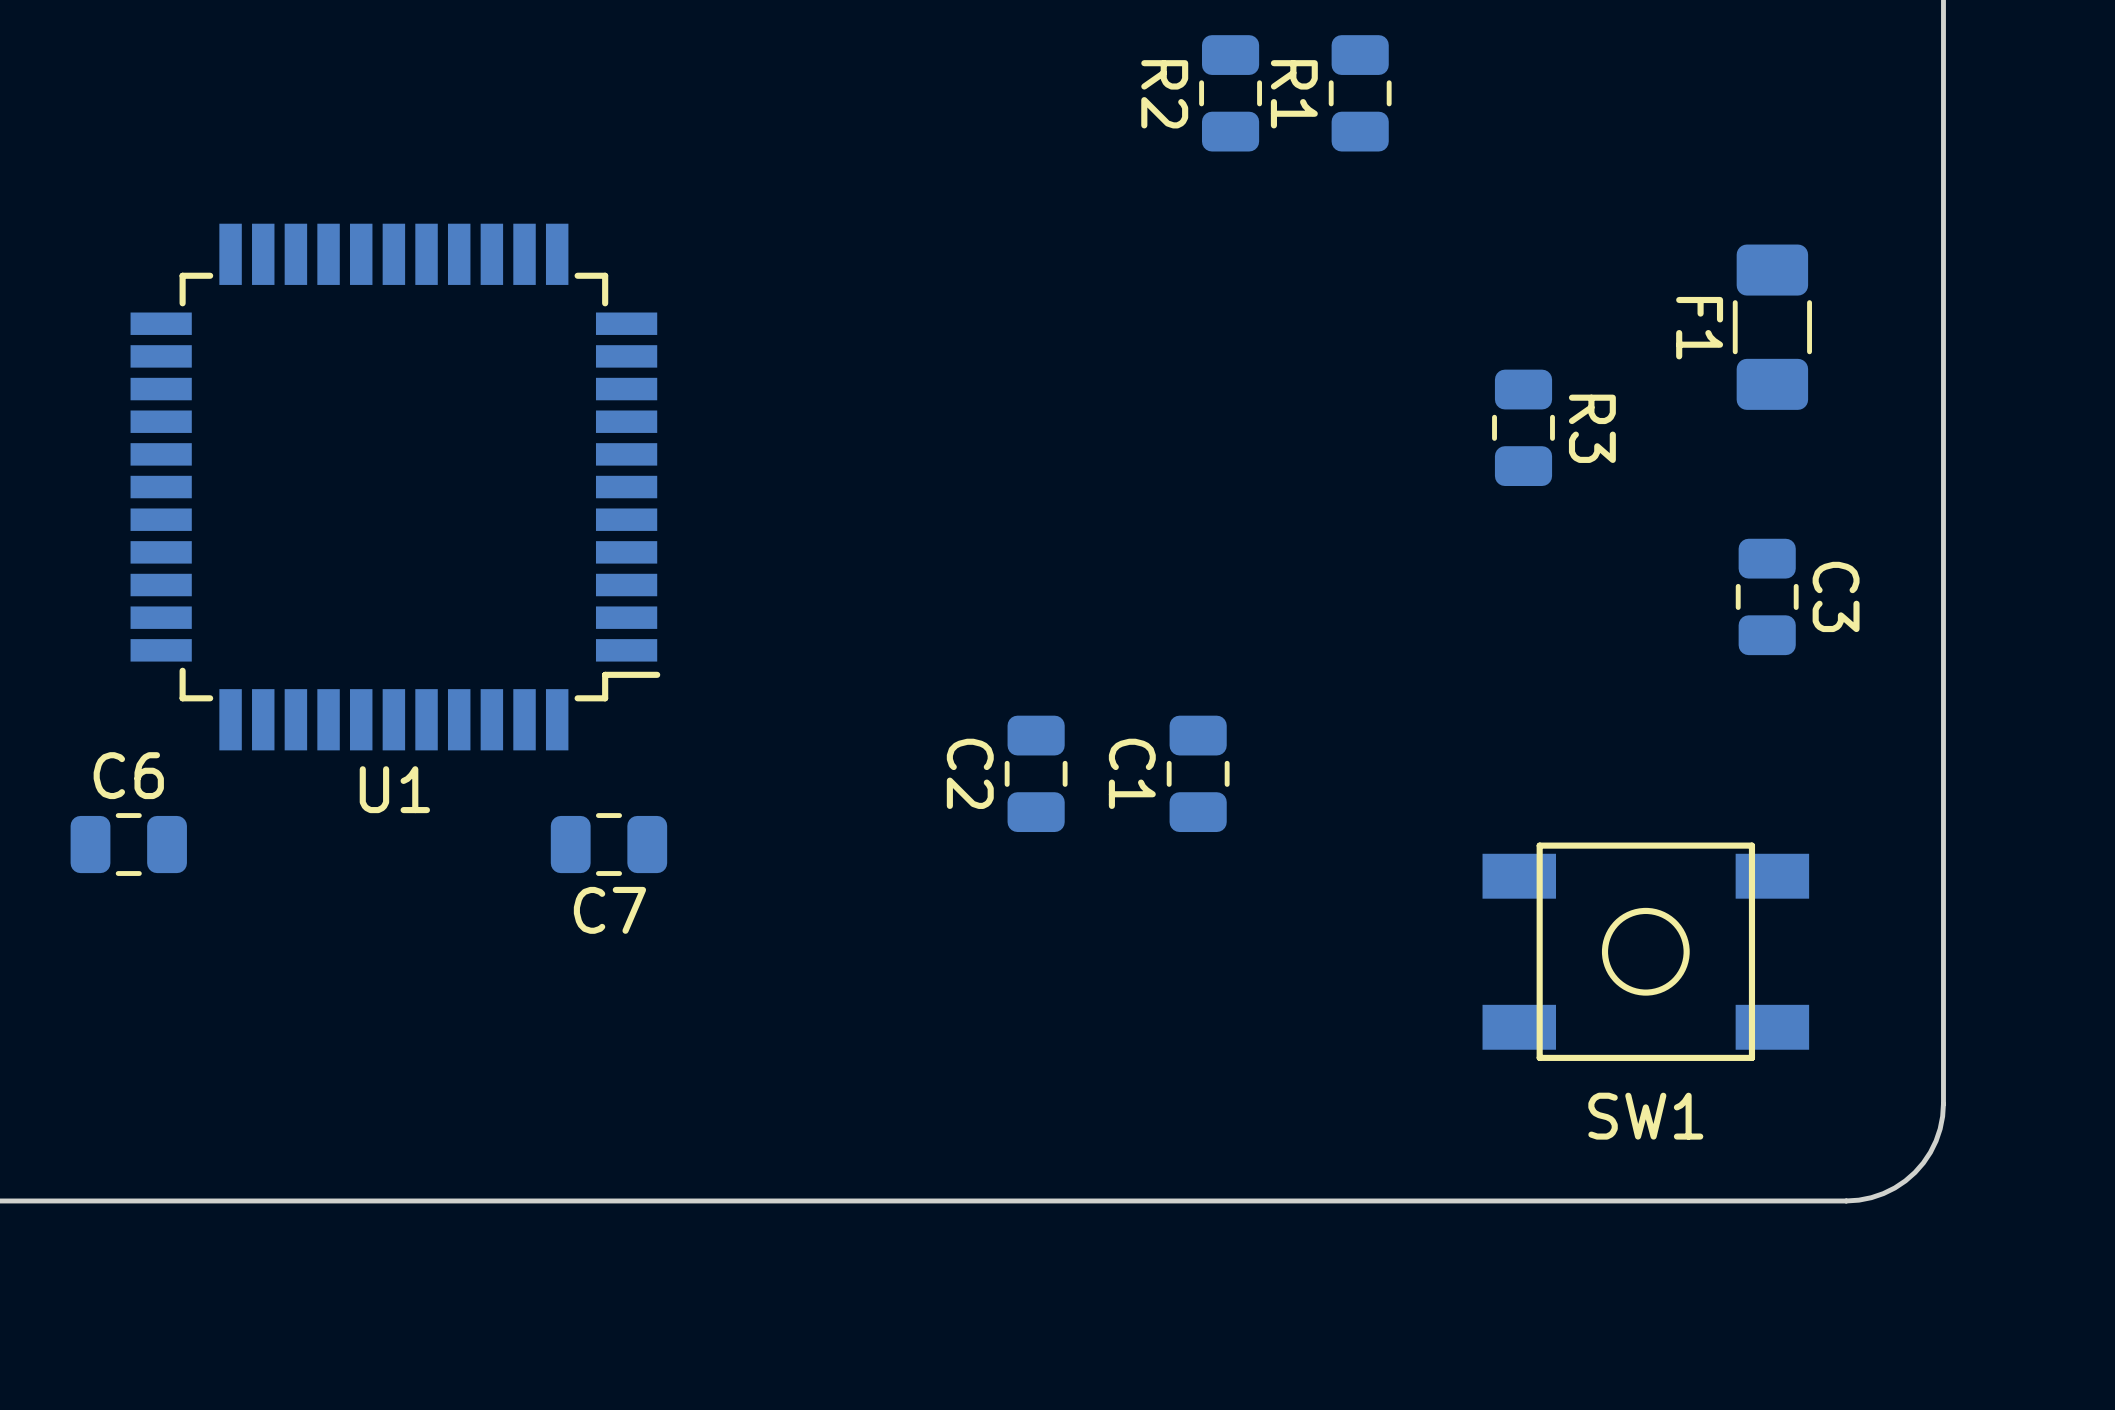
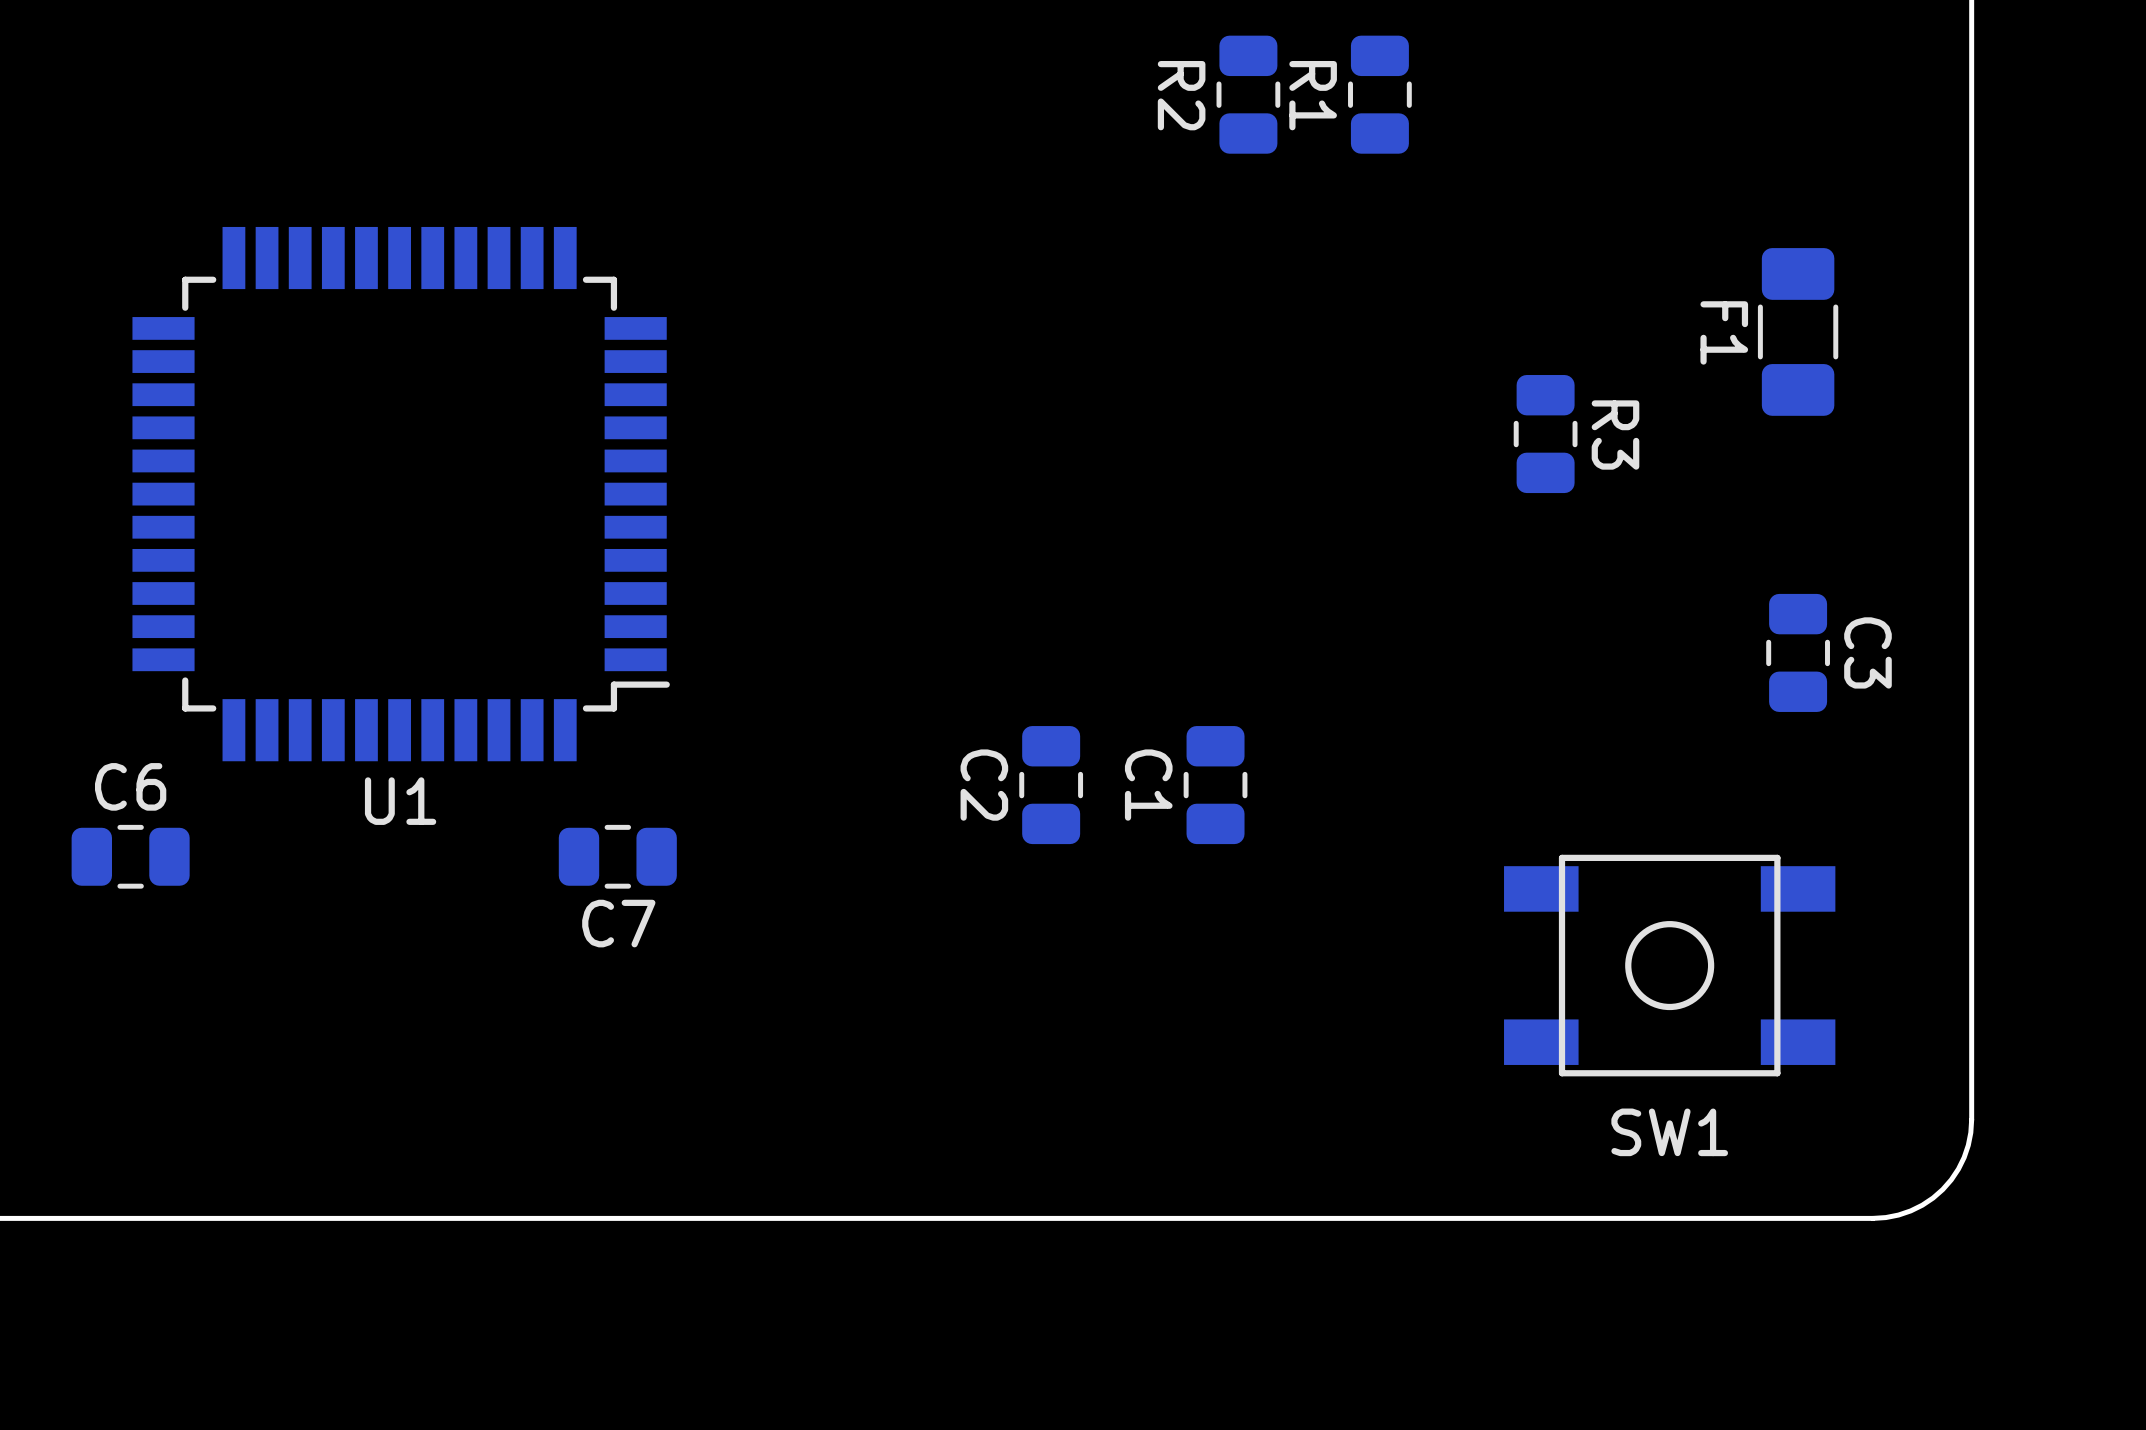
C3 position: (1767, 596) -> (1798, 652)

